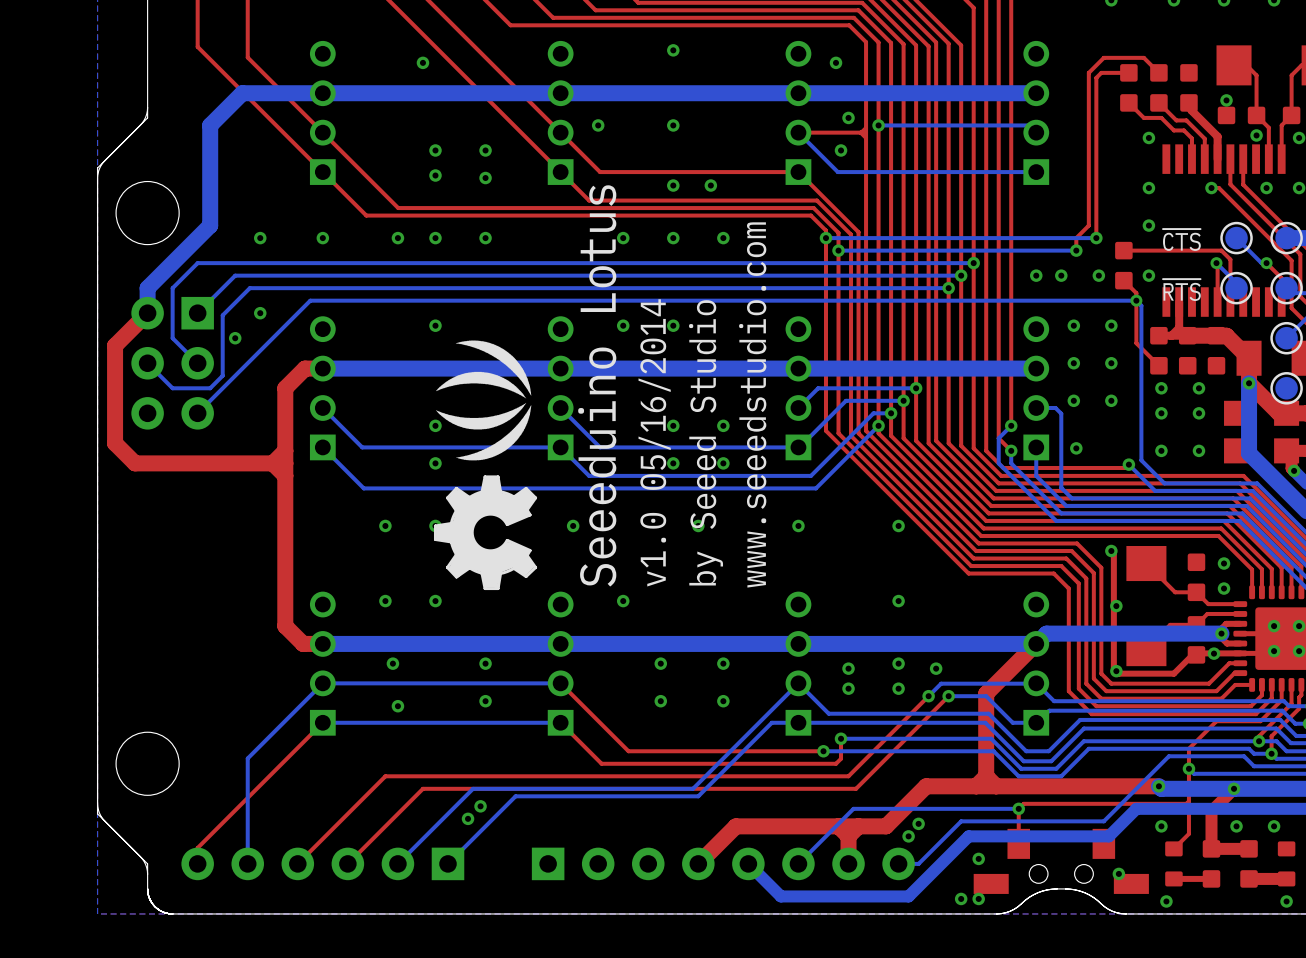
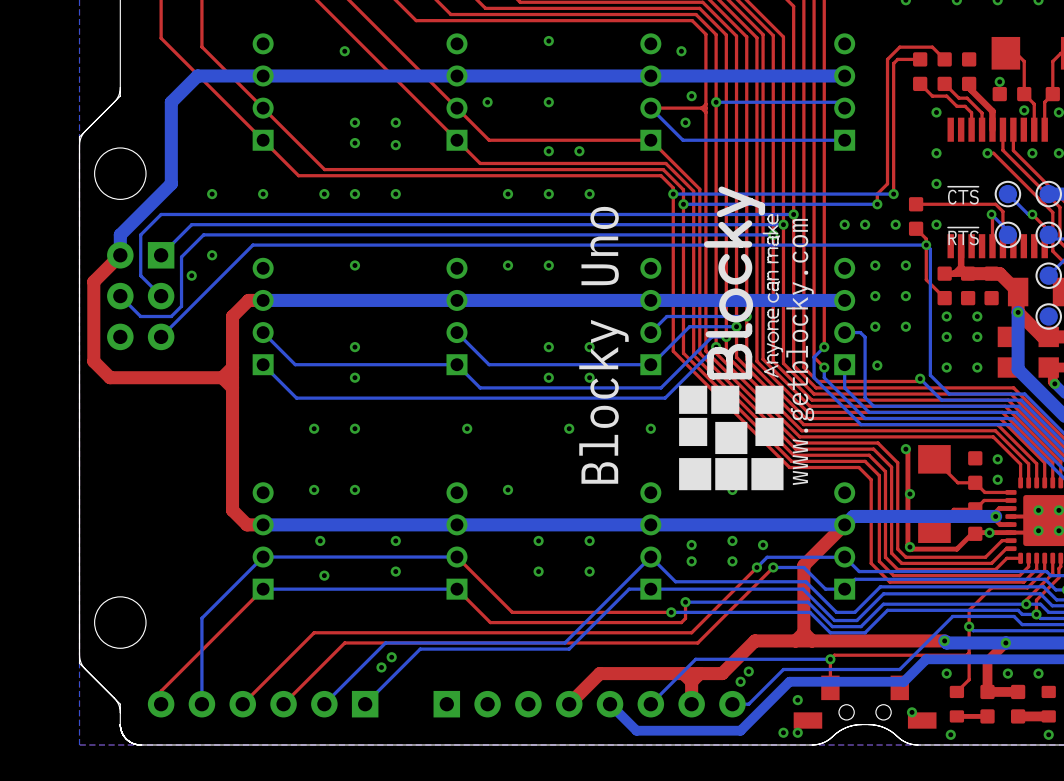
drawing: none -> [679, 186, 784, 491]
drawing: [433, 340, 538, 591] -> none
text: Seeeduino Lotus (597, 385) -> none
text: www.seeedstudio.com (752, 404) -> Blocky Uno (603, 345)
text: v1.0 05/16/2014 (654, 442) -> none
text: by Seeed Studio (706, 442) -> none

